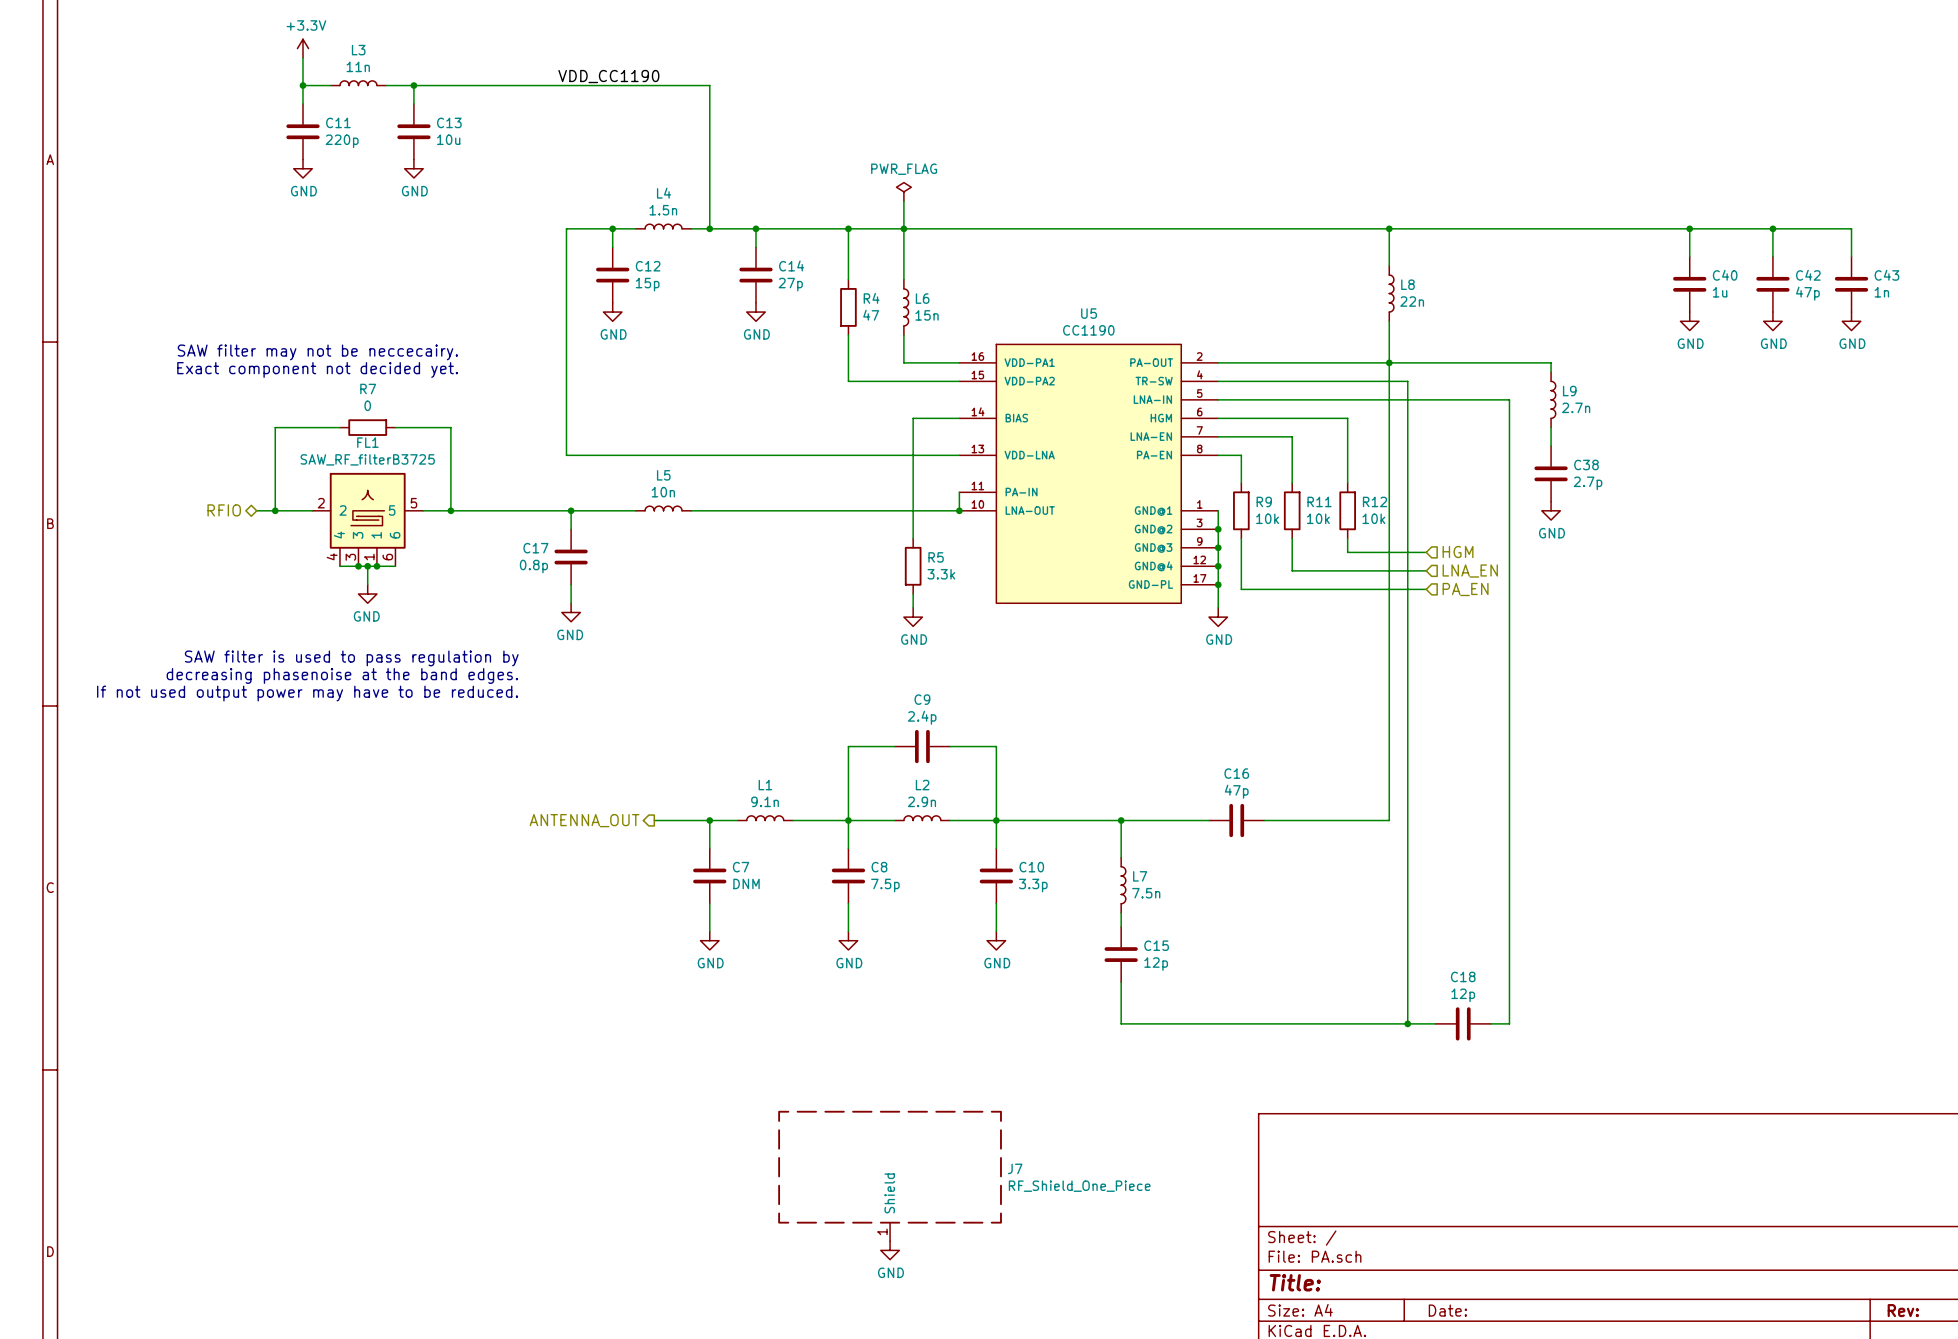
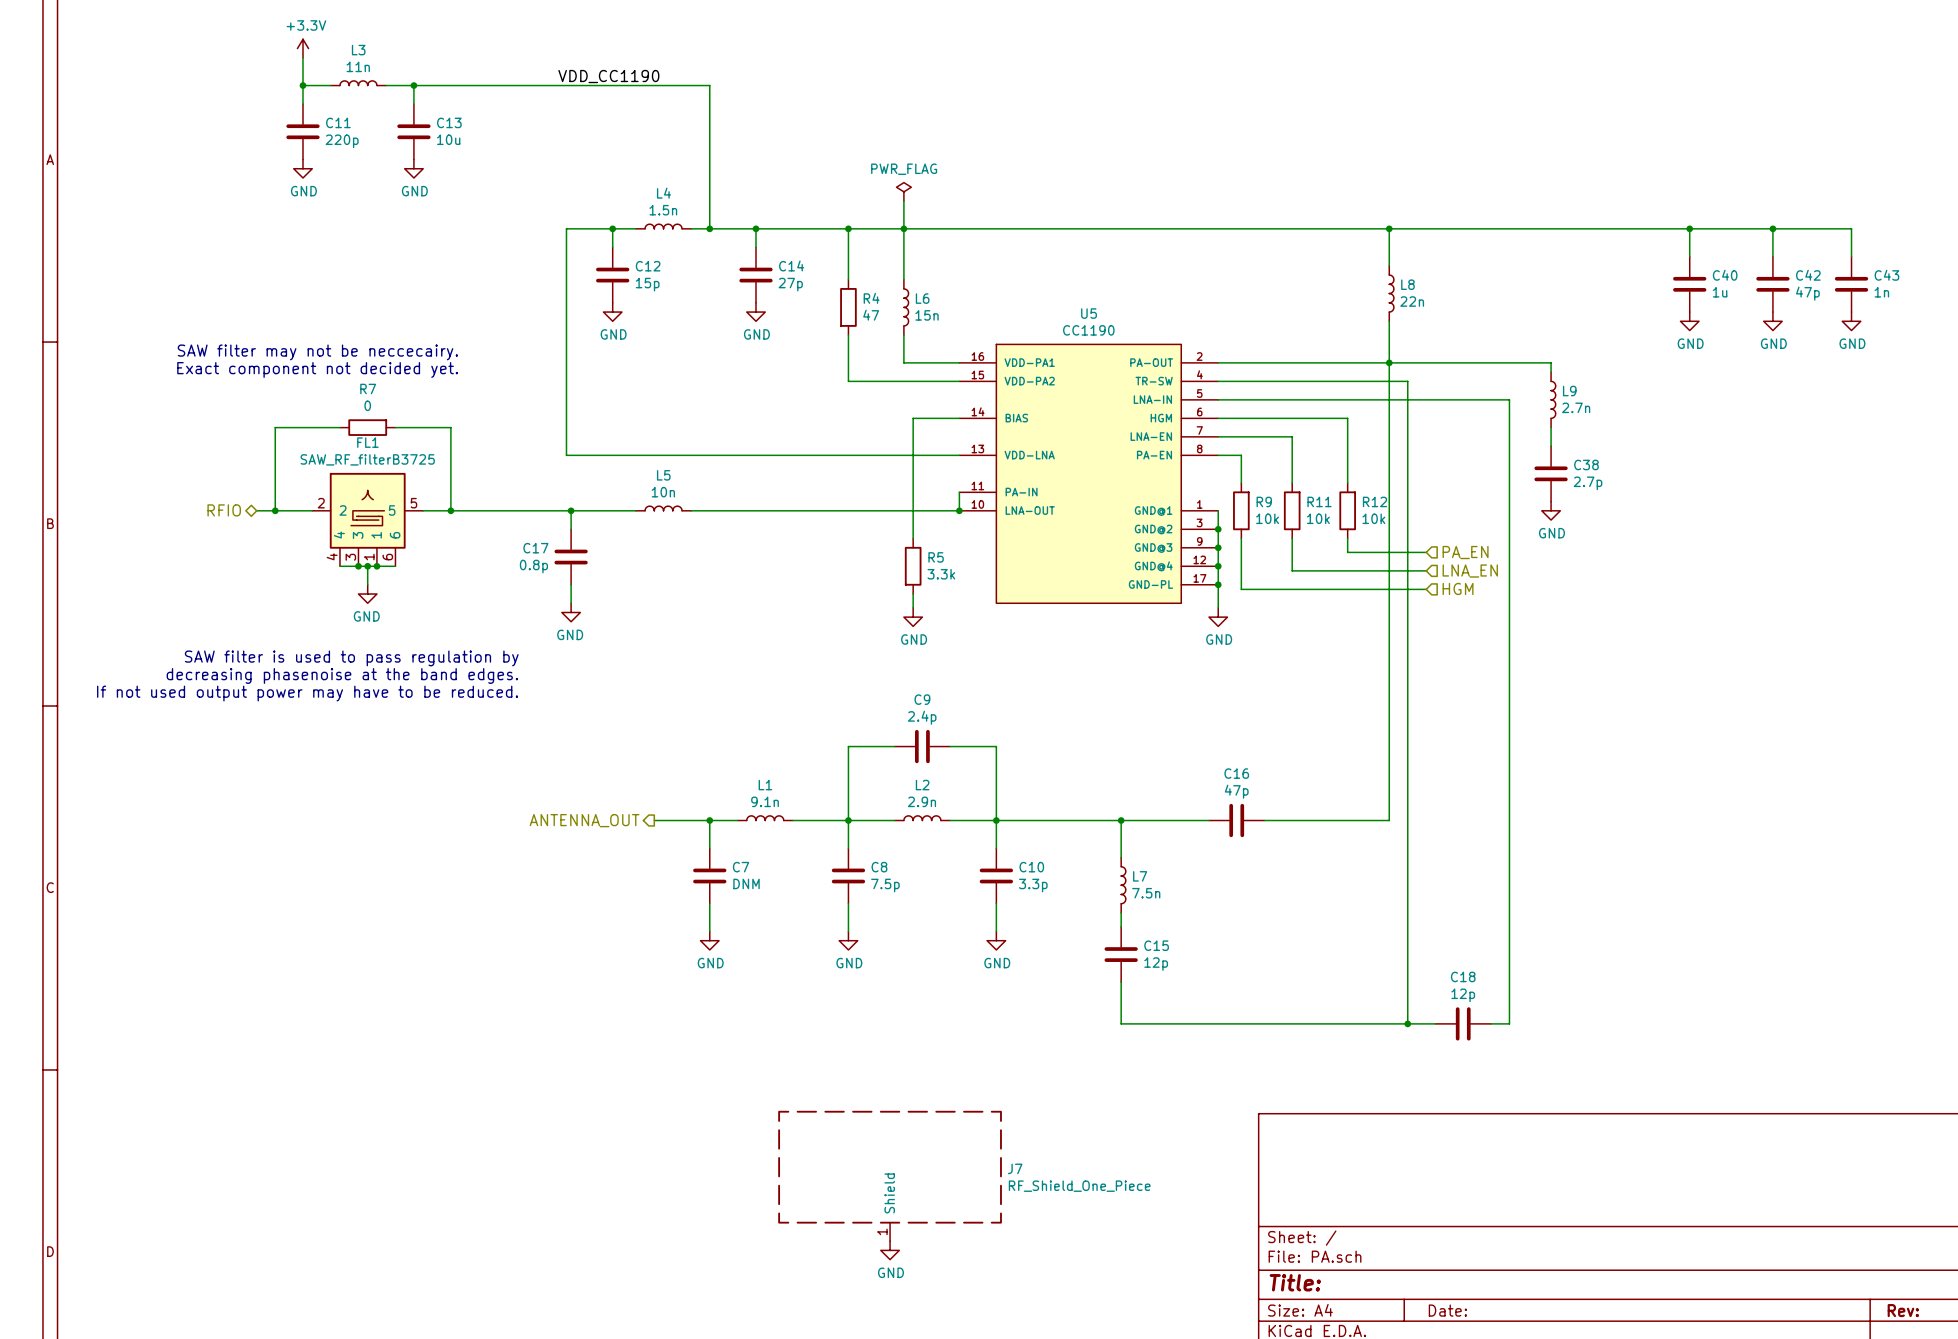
hierarchical label: HGM (1458, 552) -> PA_EN (1465, 552)
hierarchical label: PA_EN (1465, 589) -> HGM (1458, 588)

